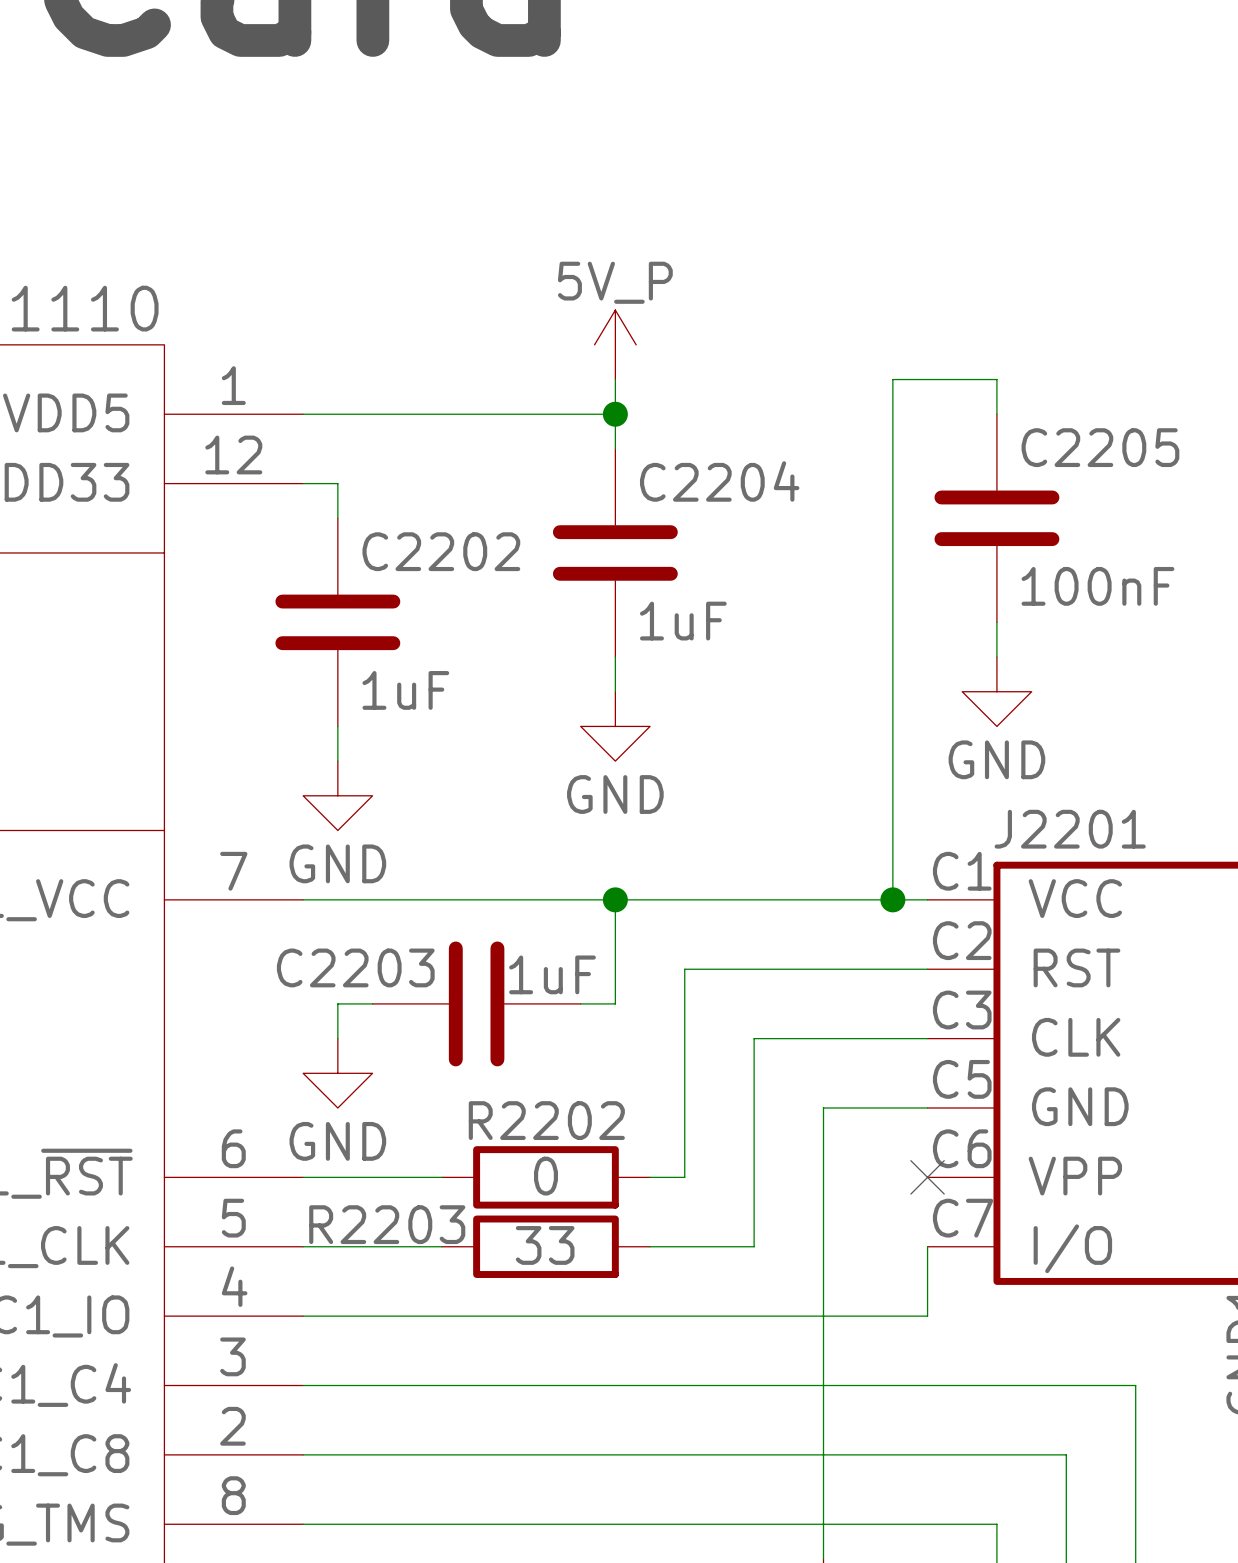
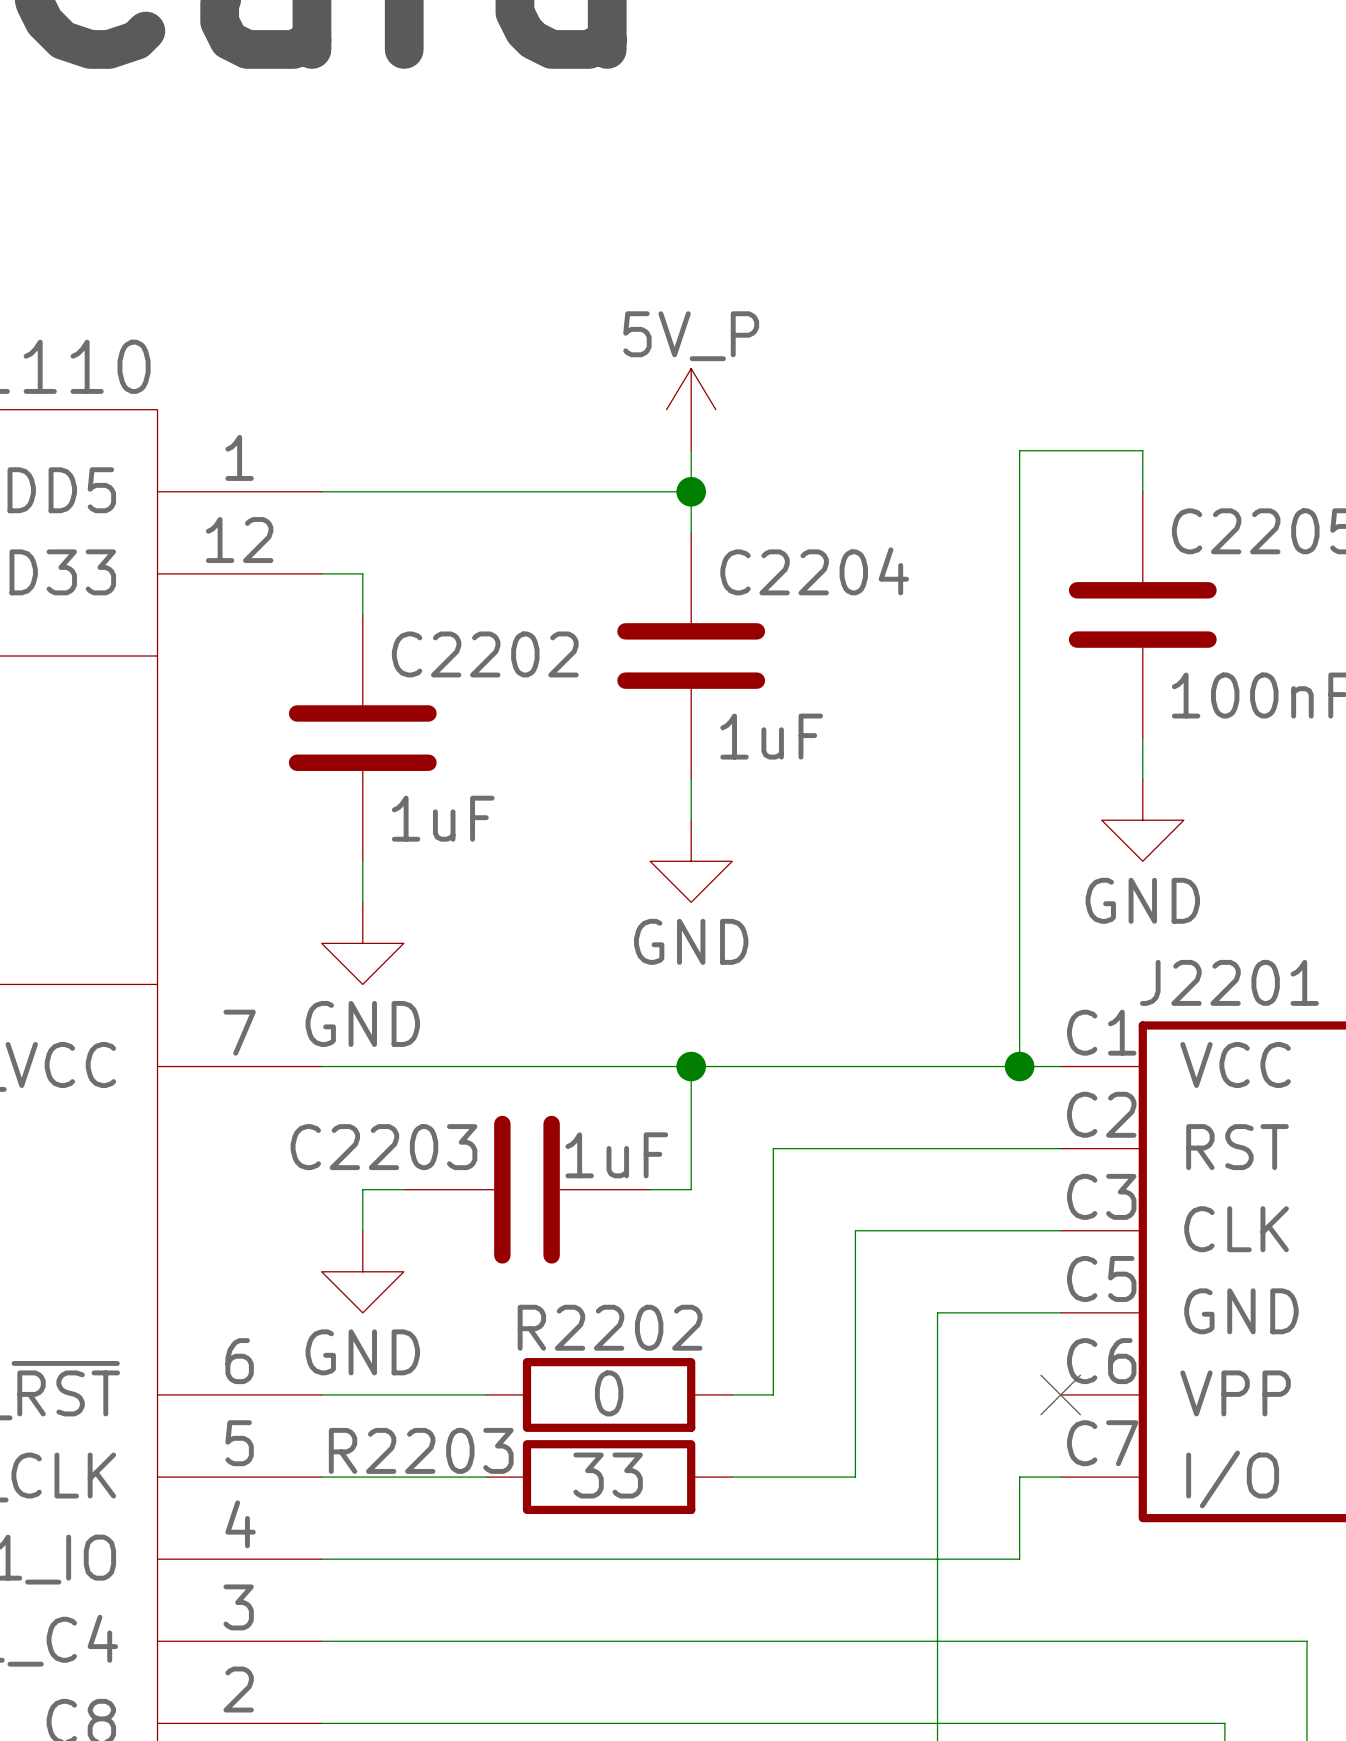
wire: (927, 1246) (927, 1316) (892, 1316) -> (1060, 1477) (1019, 1477) (1019, 1559)

